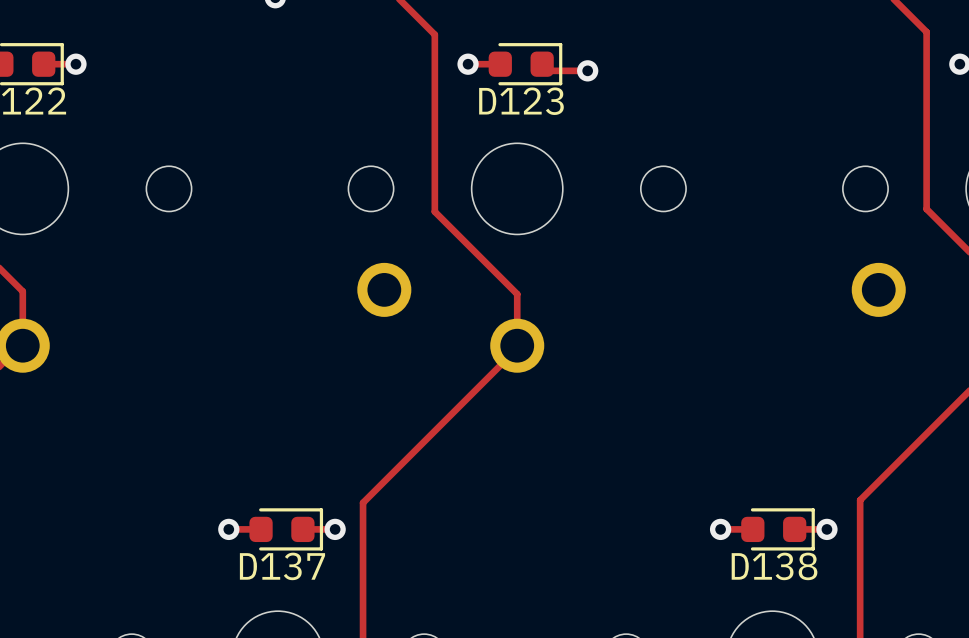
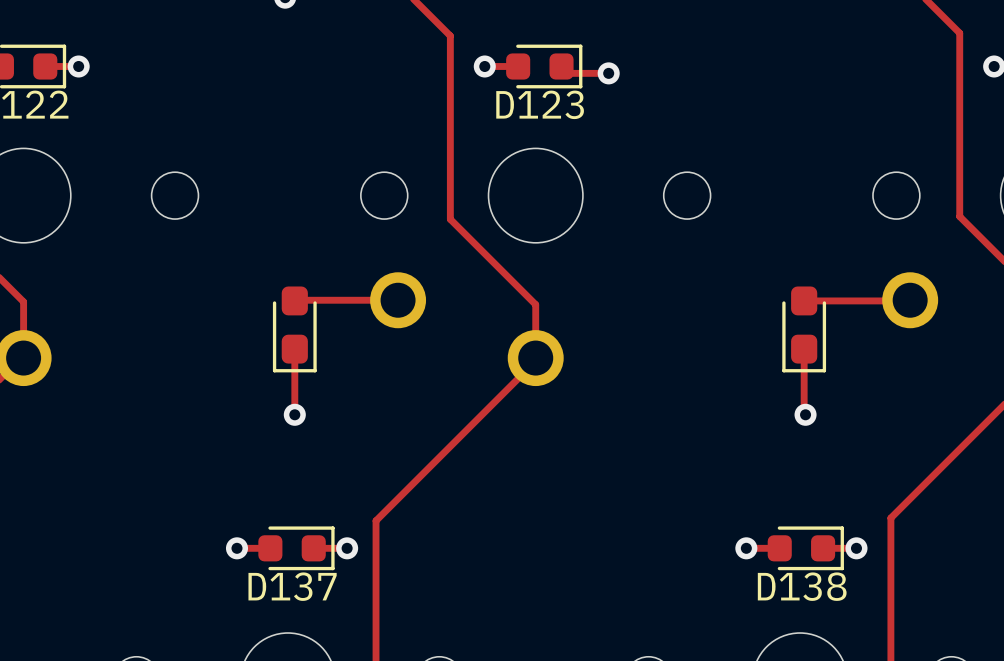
track: none -> (398, 300) (294, 300)
track: none -> (910, 300) (804, 300)
part: none -> (294, 329)
part: none -> (804, 329)
track: none -> (294, 349) (294, 414)
track: none -> (804, 349) (805, 414)
via: none -> (294, 414)
via: none -> (805, 414)

